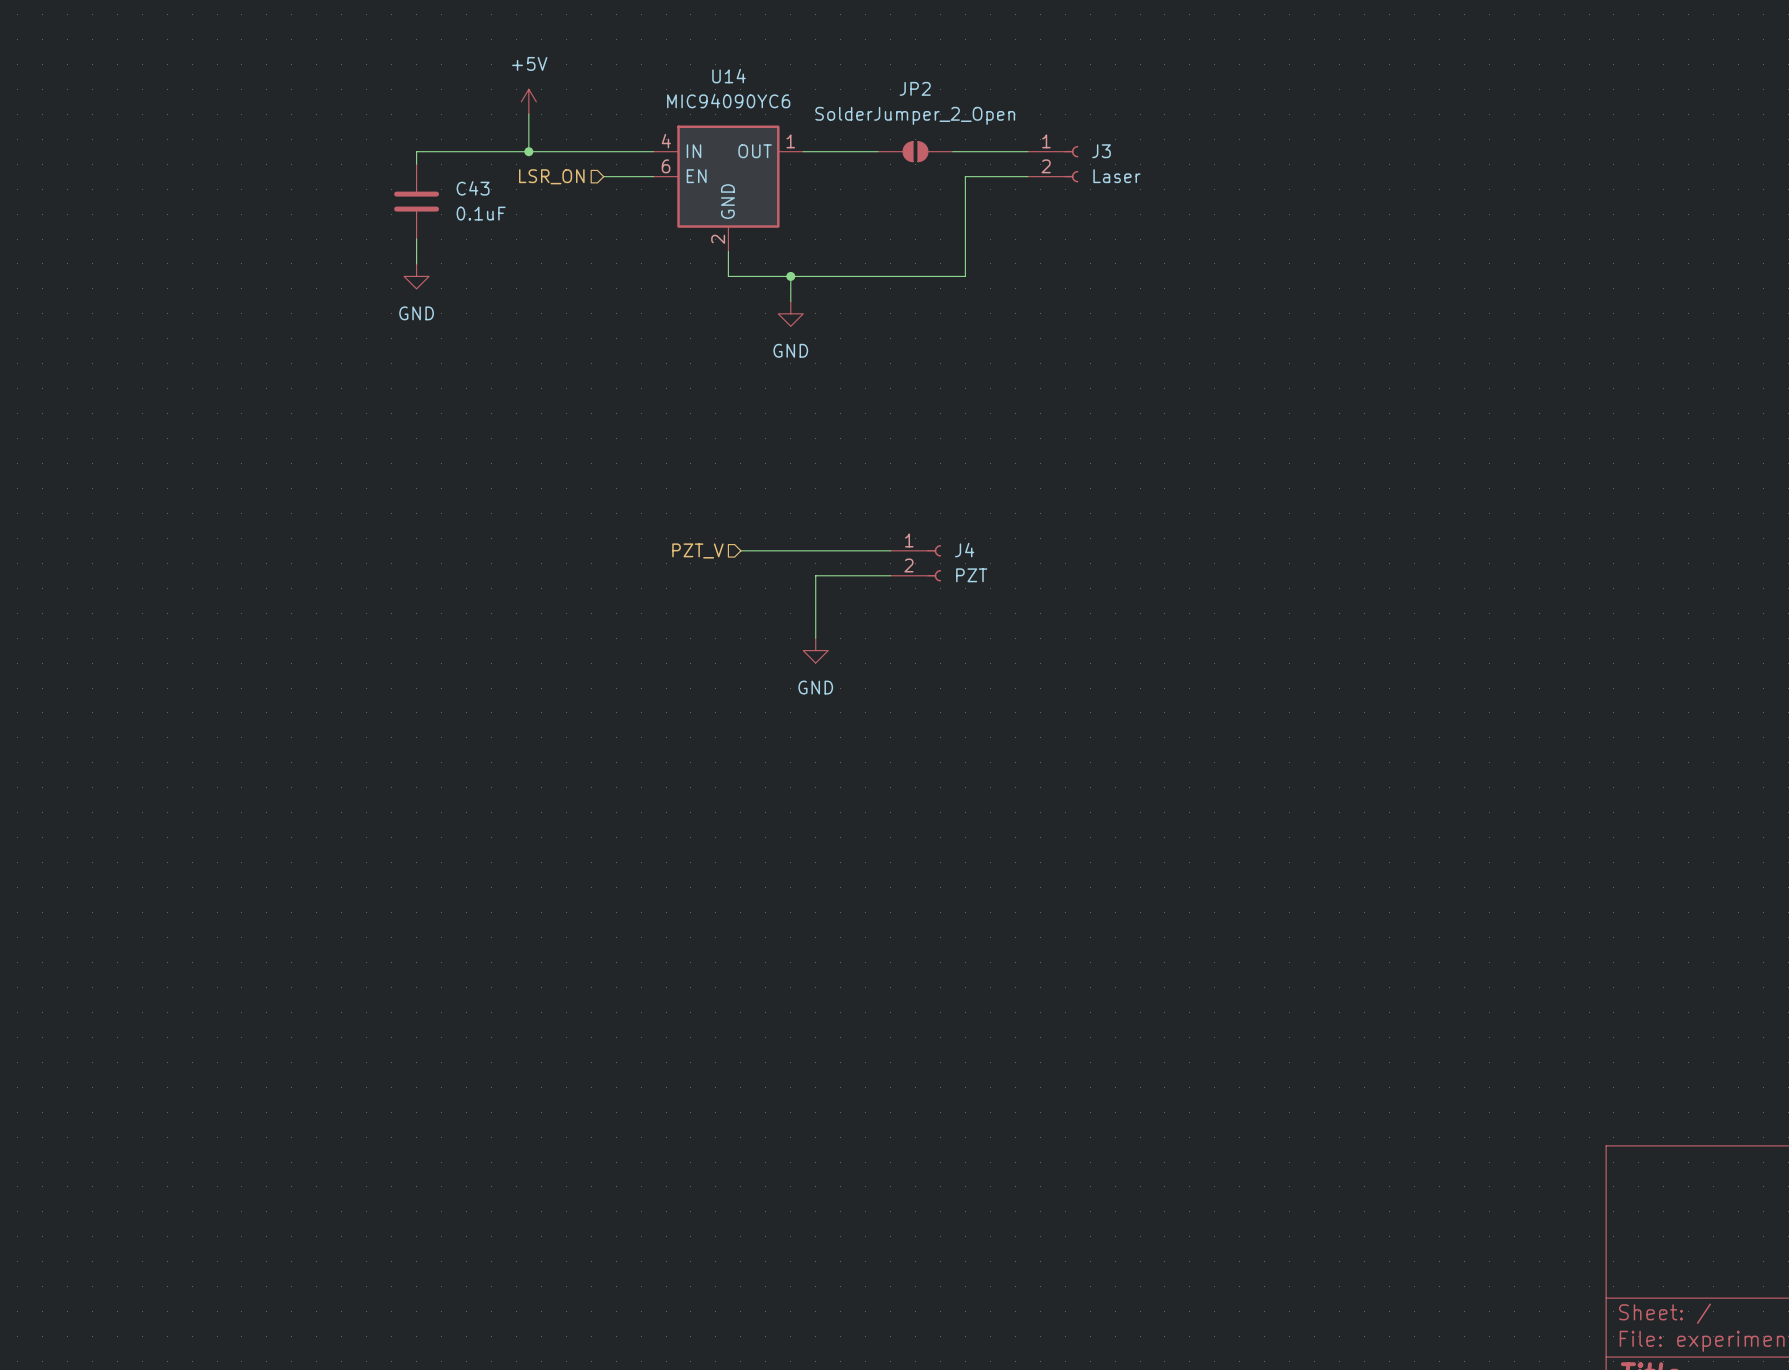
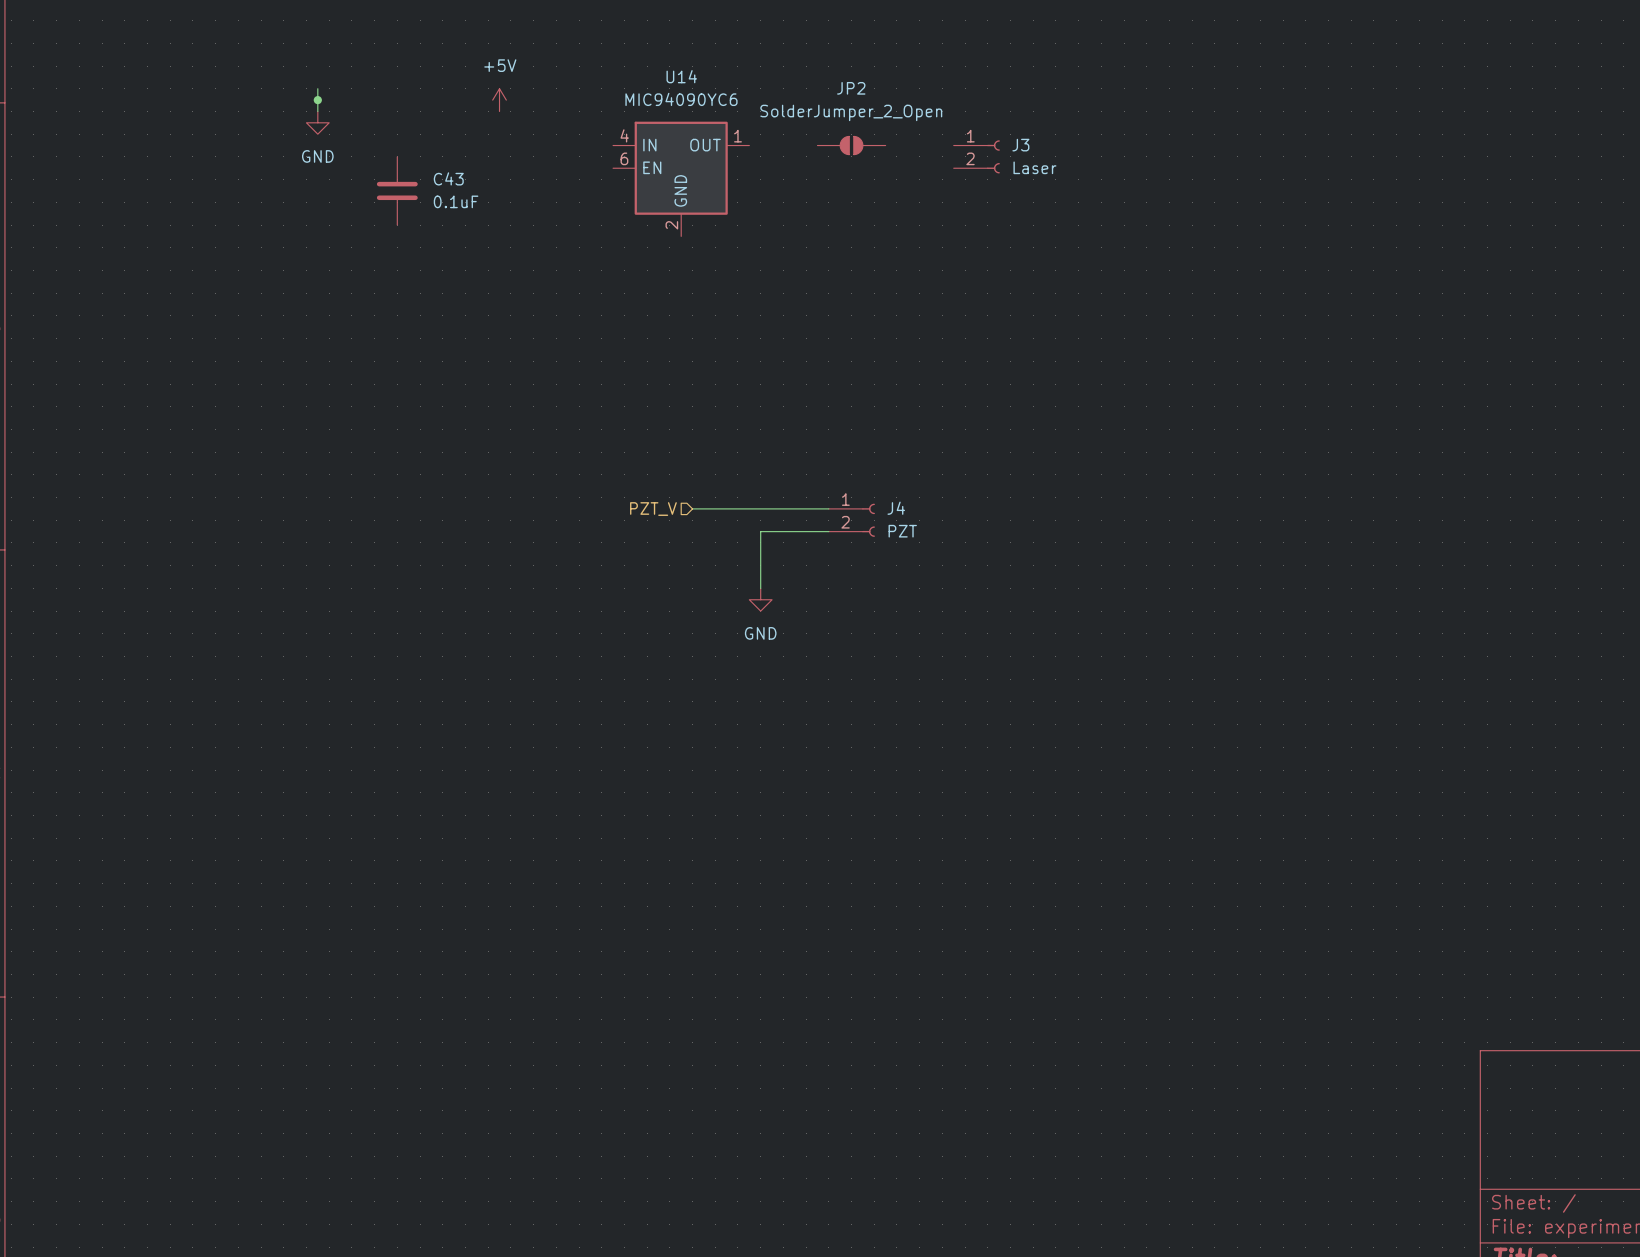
junction: none -> (317, 100)
wire: (528, 114) (528, 151) -> none
junction: (528, 151) -> none
wire: (653, 151) (416, 151) (416, 164) -> none
wire: (803, 151) (878, 151) -> none
wire: (952, 151) (1027, 151) -> none
hierarchical label: LSR_ON (551, 176) -> none
wire: (603, 176) (653, 176) -> none
wire: (1027, 176) (965, 176) (965, 276) (728, 276) (728, 251) -> none
wire: (416, 239) (416, 263) -> (317, 88) (317, 111)
power symbol position: GND (416, 276) -> GND (317, 122)
wire: (790, 276) (790, 301) -> none
junction: (790, 276) -> none
power symbol: GND (790, 313) -> none

